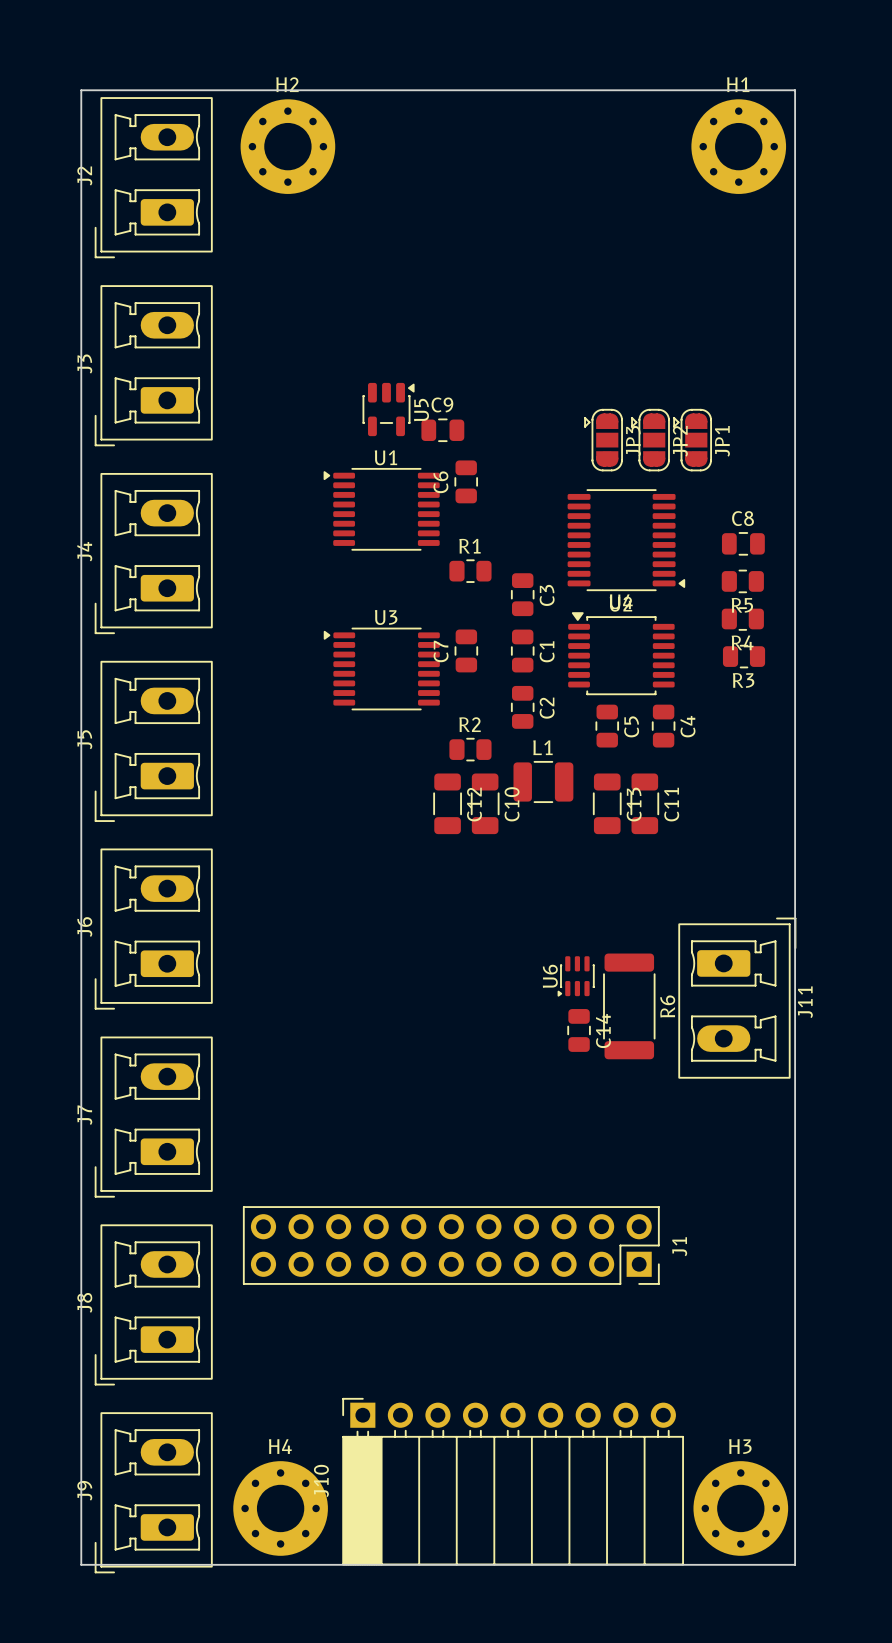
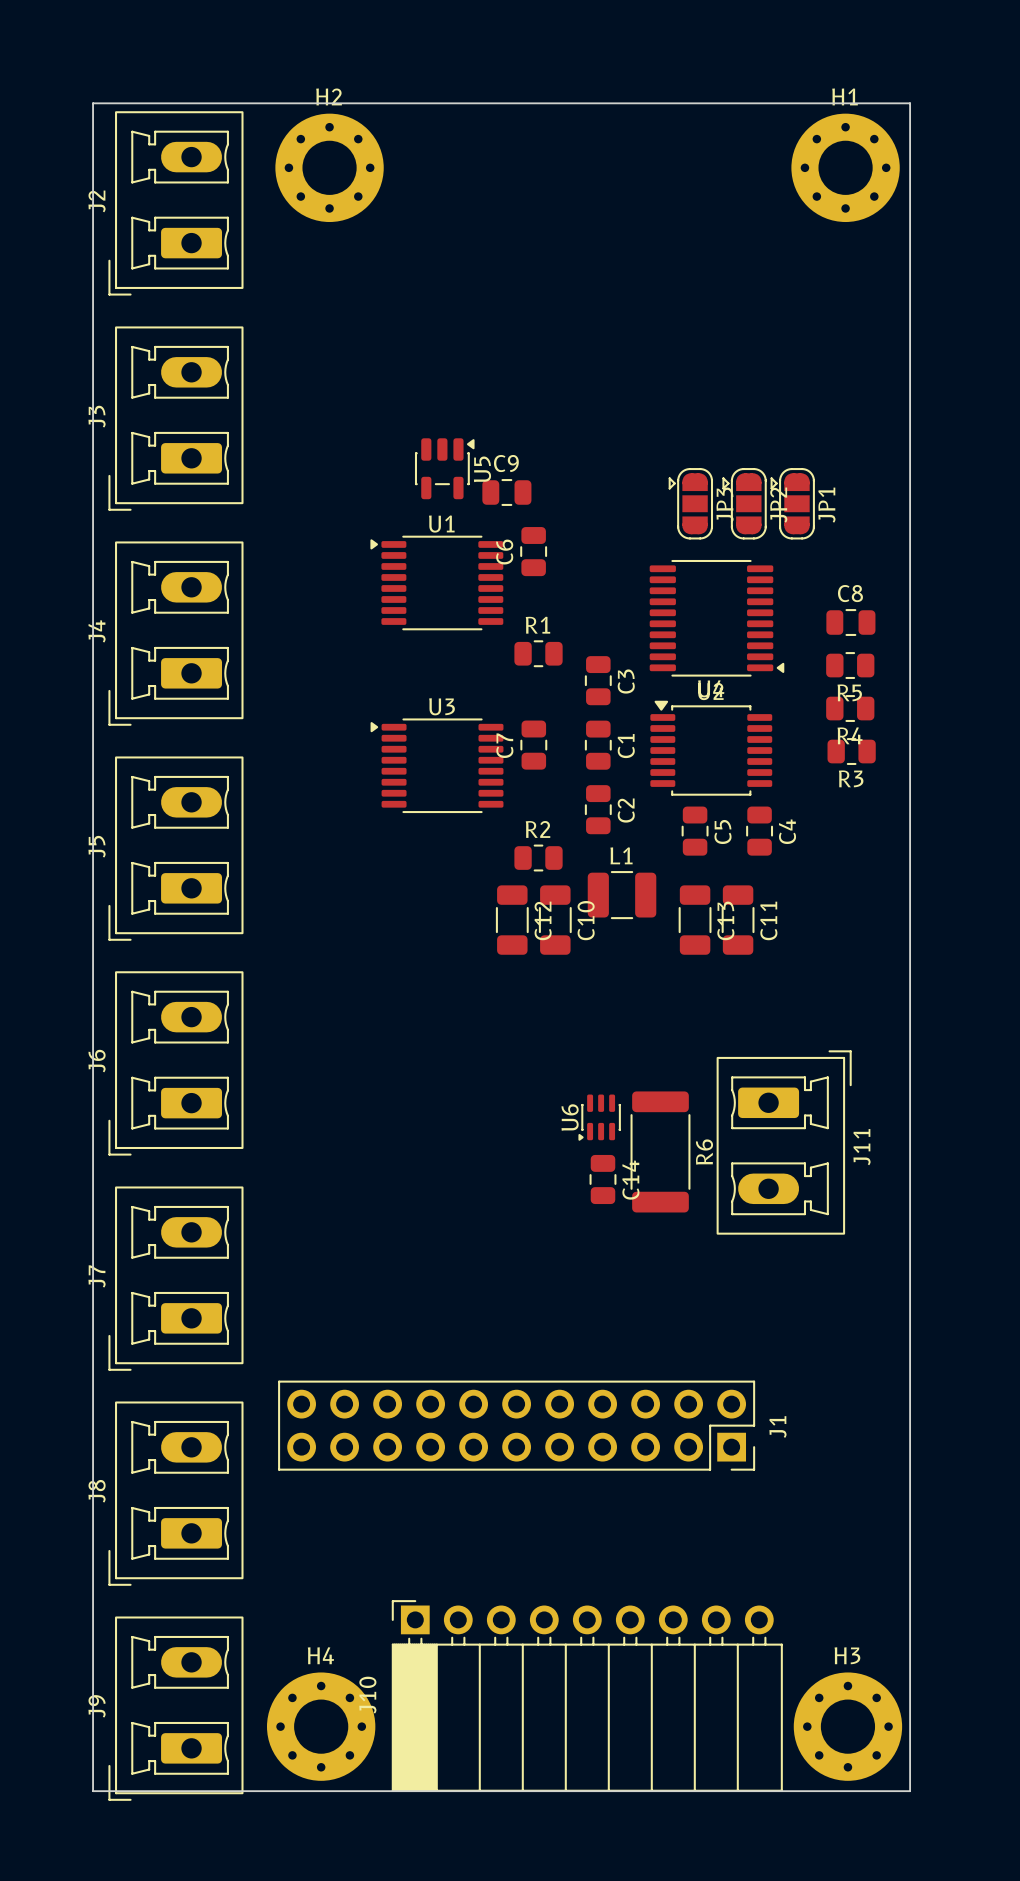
U6 position: (576, 976) -> (599, 1117)
J11 position: (737, 998) -> (784, 1142)
R6 position: (629, 1006) -> (660, 1151)
C14 position: (579, 1030) -> (603, 1179)

